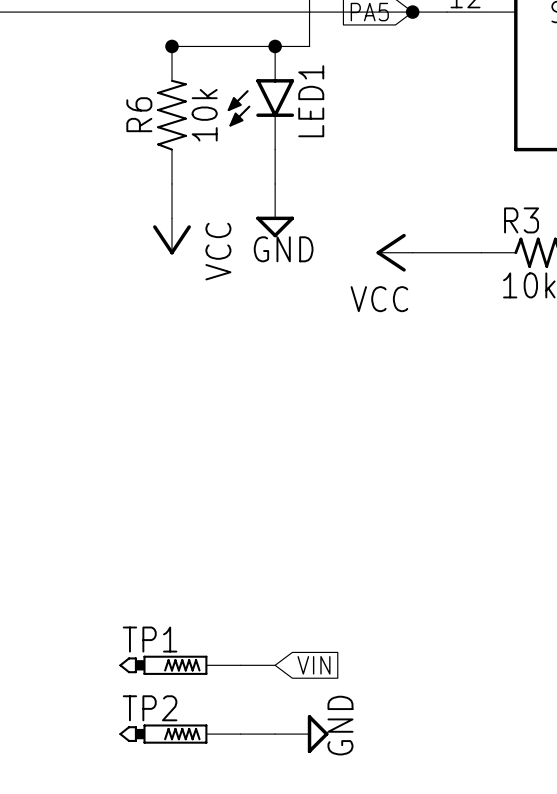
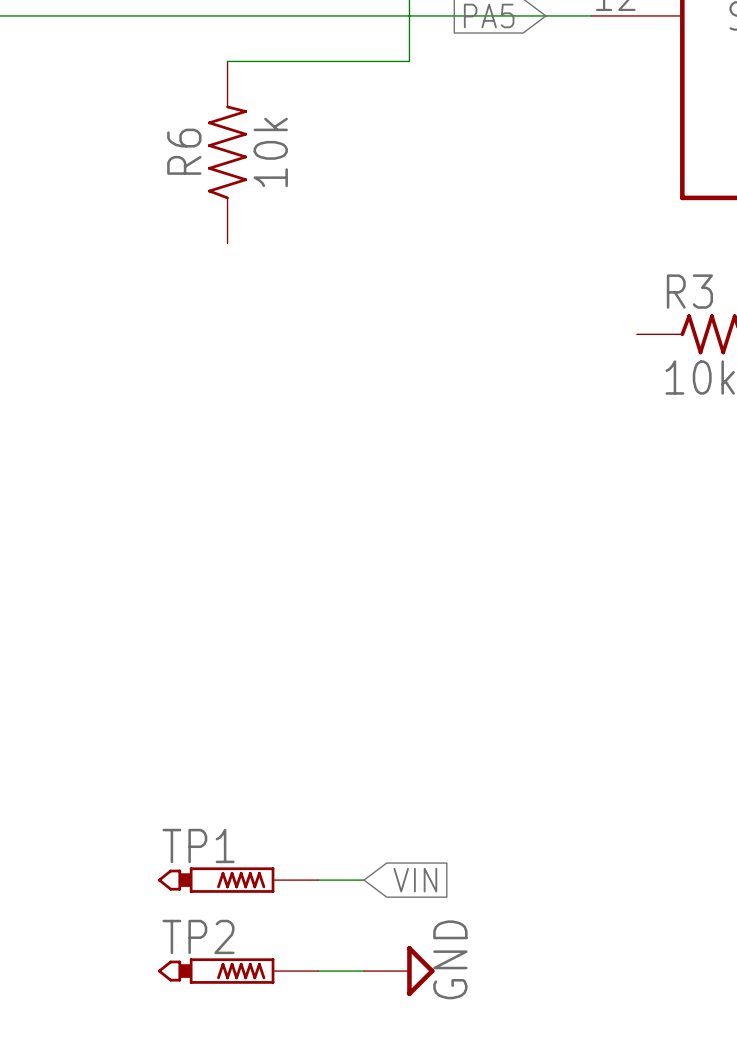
junction: (412, 12) -> none
junction: (172, 46) -> none
junction: (275, 46) -> none
LED1: (260, 98) -> none
wire: (275, 149) (275, 183) -> none
wire: (172, 183) (172, 218) -> none
power symbol: GND (275, 210) -> none
power symbol: VCC (172, 236) -> none
power symbol: VCC (394, 252) -> none
wire: (412, 252) (481, 252) -> none

